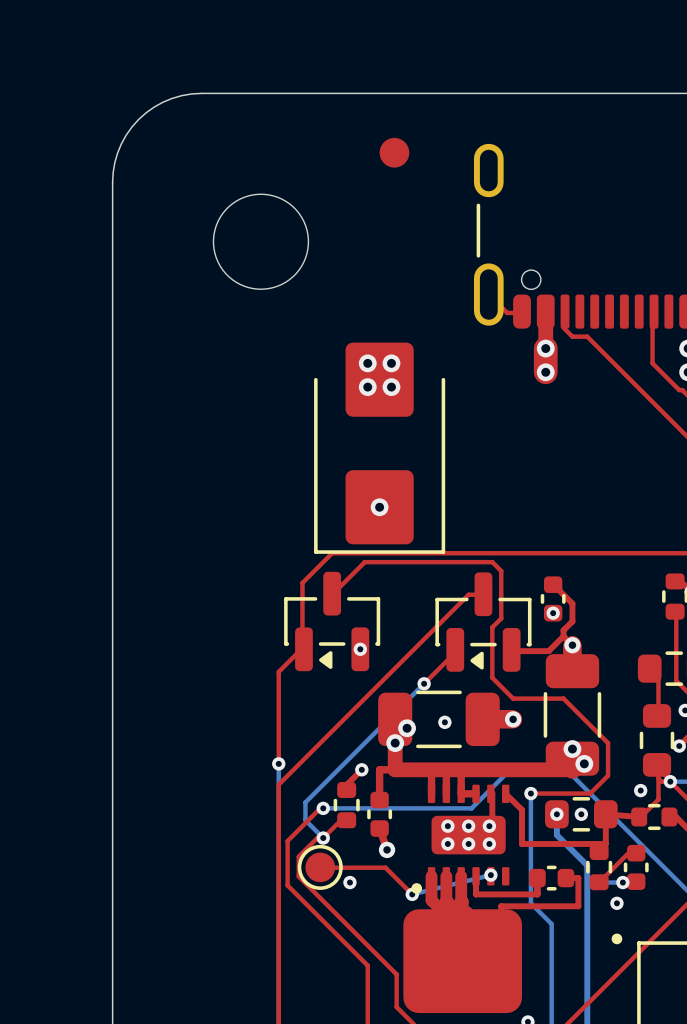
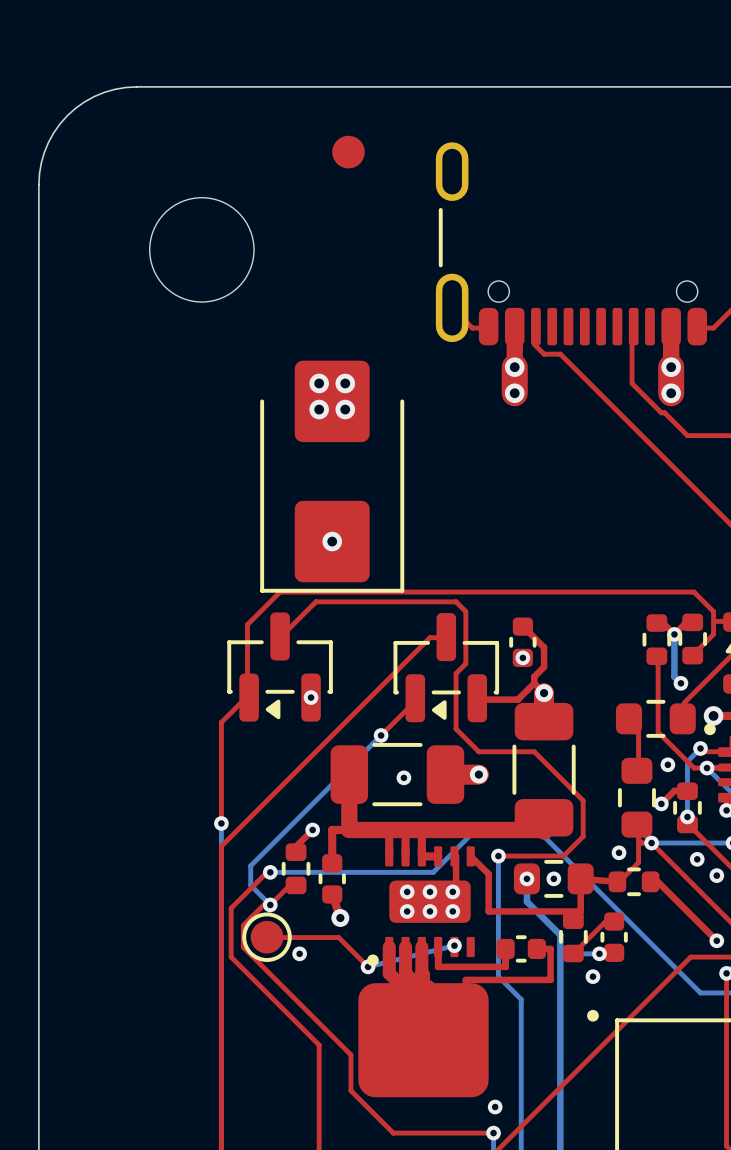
via: (407, 728) -> none
via: (395, 743) -> none
via: (572, 749) -> none
via: (584, 763) -> none

